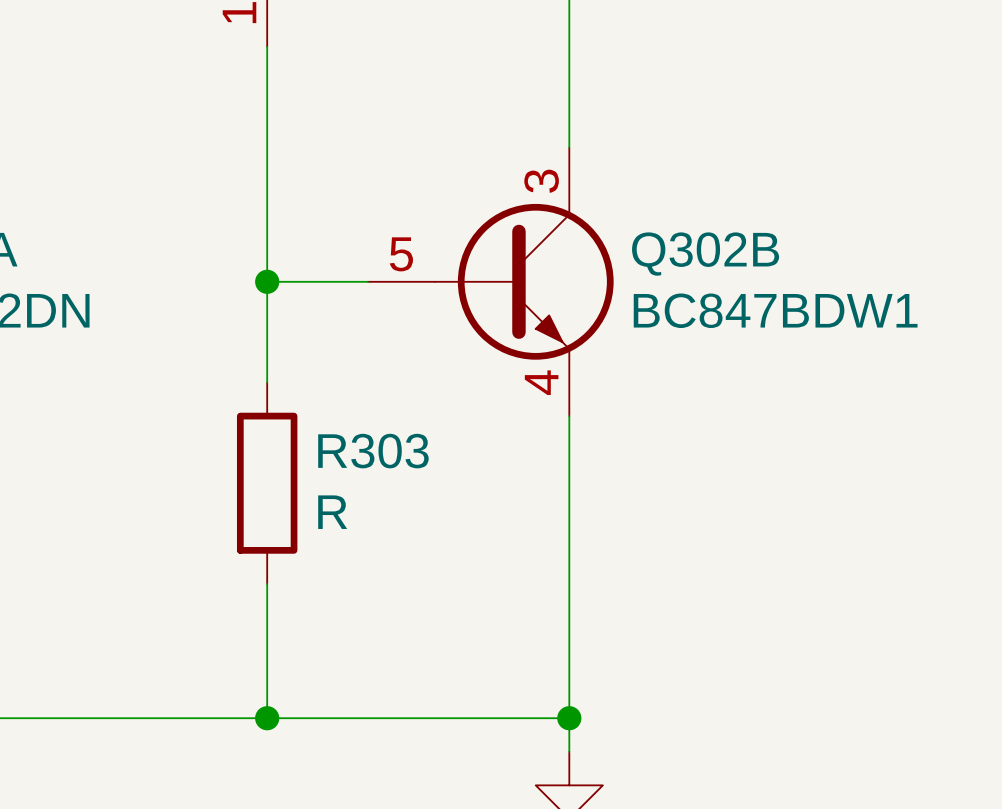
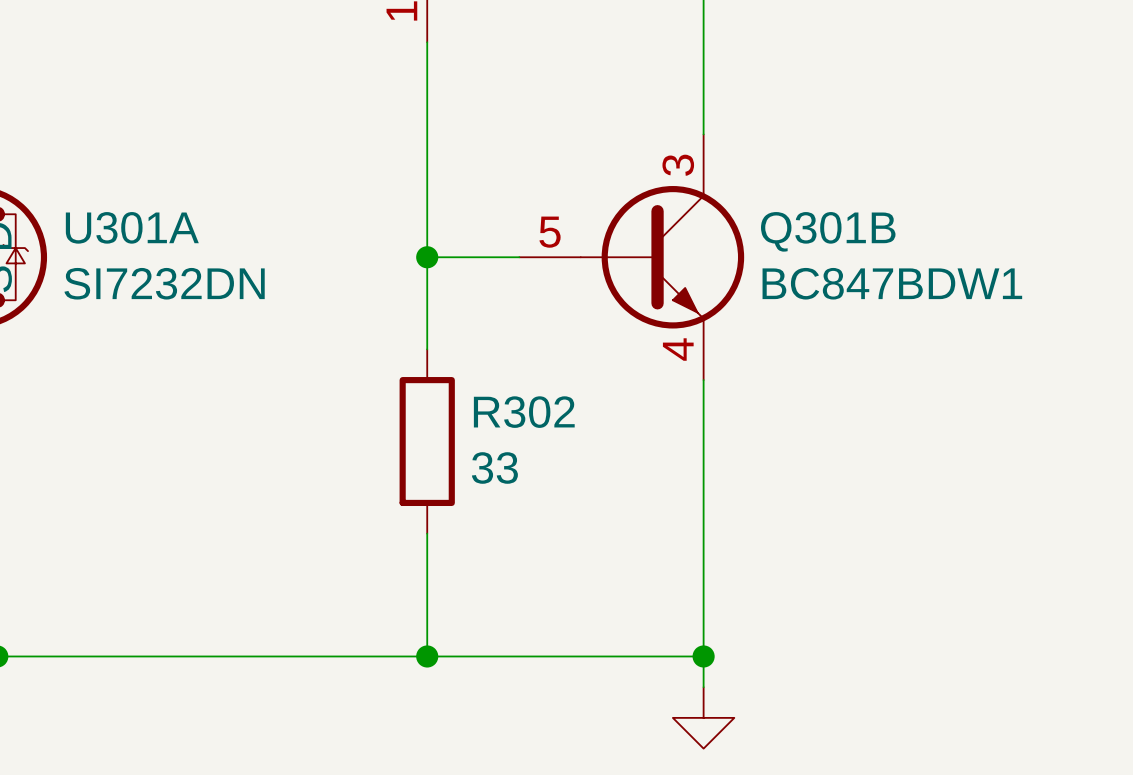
Q302B name: Q302B (705, 254) -> Q301B (828, 231)
R303 name: R303 (373, 451) -> R302 (524, 412)
R303 value: R (332, 512) -> 33 (494, 467)

